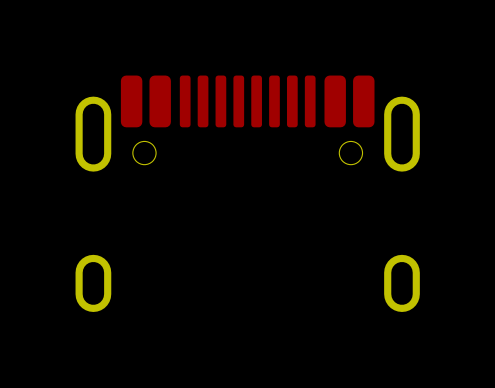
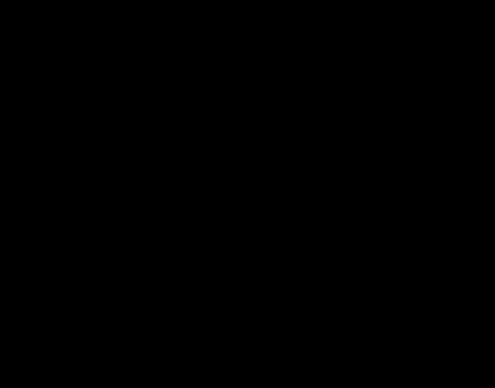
part: (247, 193) -> none

